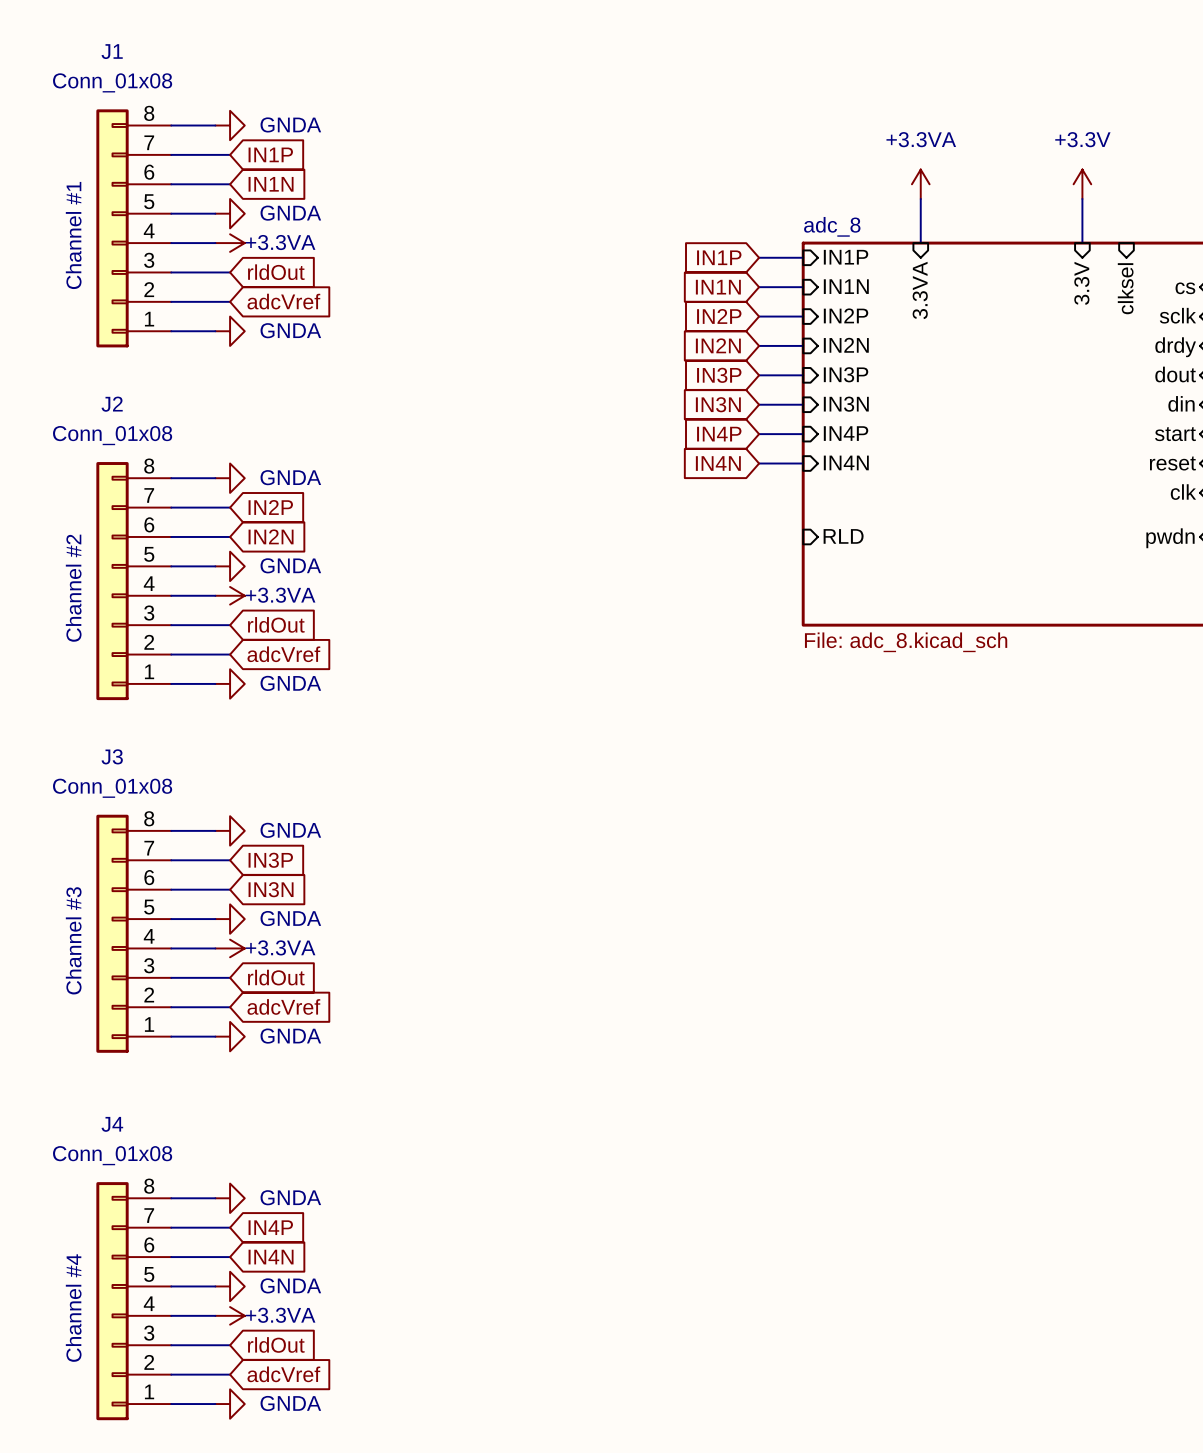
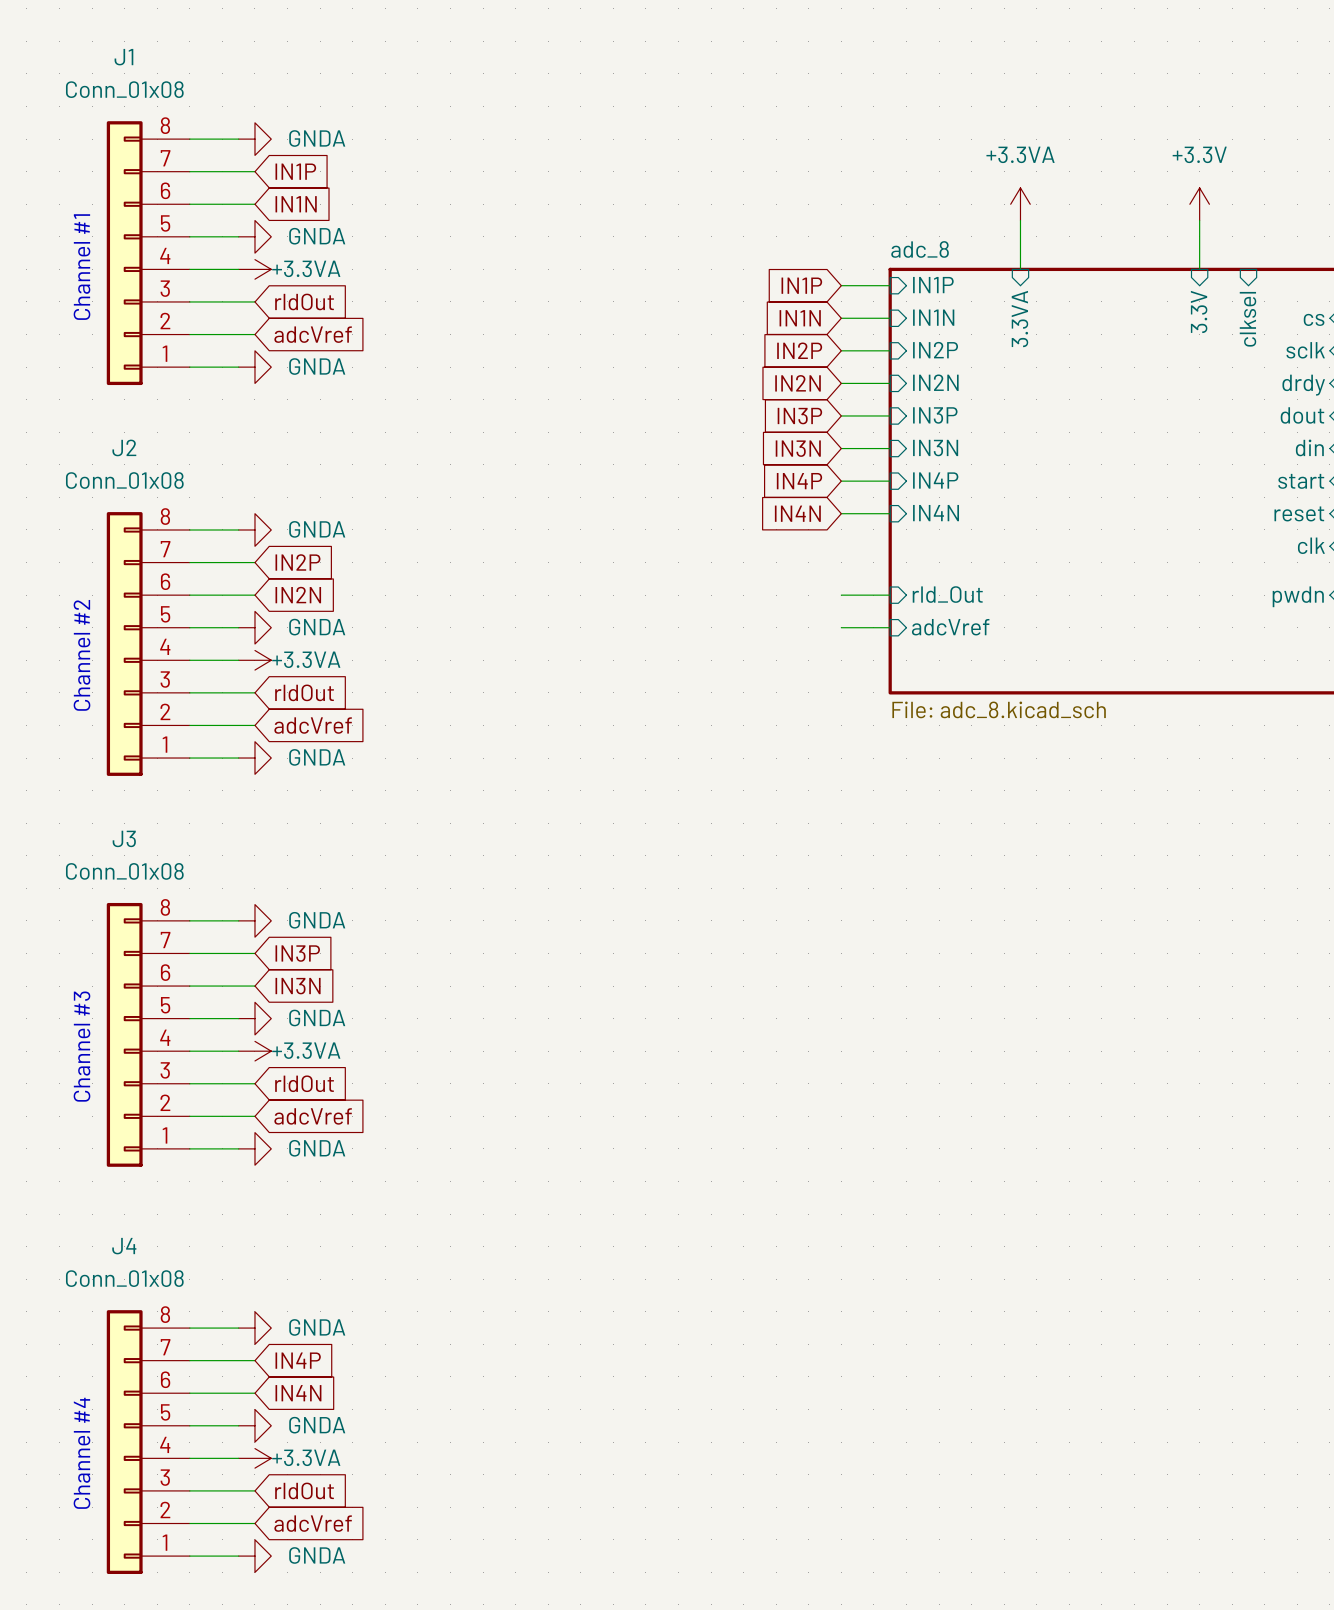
wire: none -> (841, 595) (890, 595)
sheet pin: RLD (843, 536) -> rld_Out (947, 594)
sheet pin: none -> adcVref (950, 627)
wire: none -> (841, 627) (890, 627)

